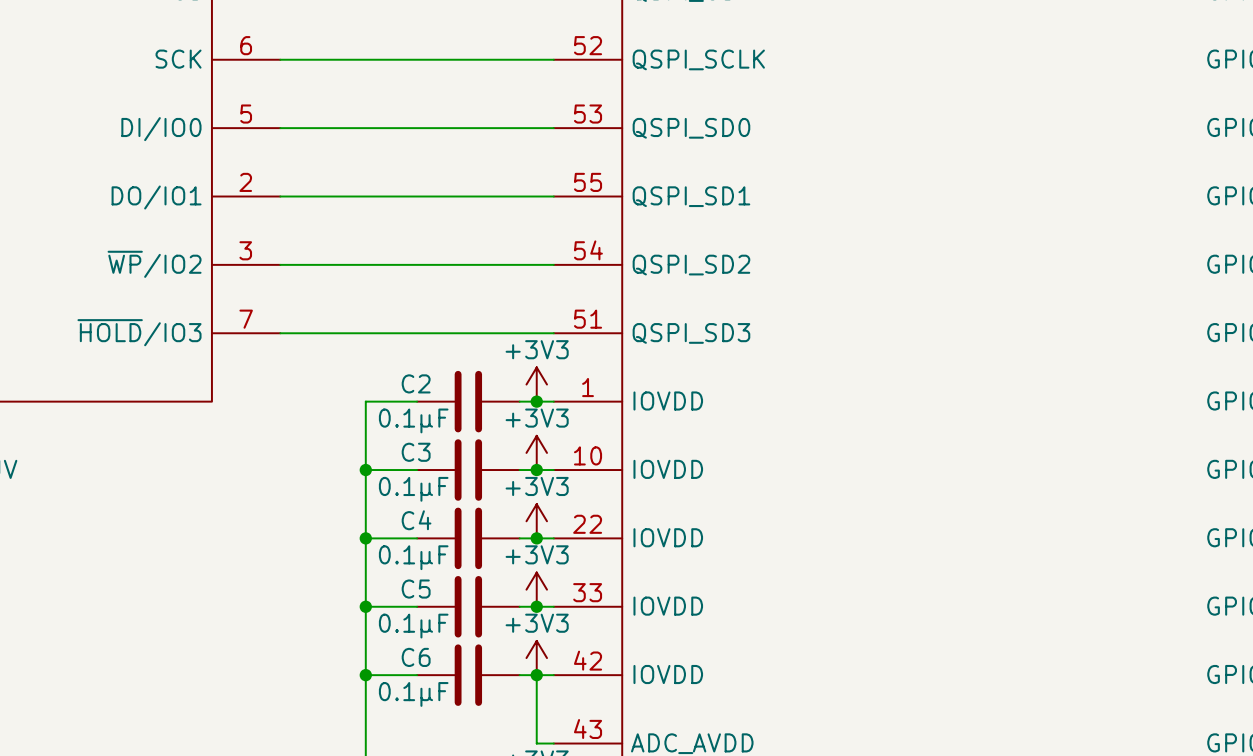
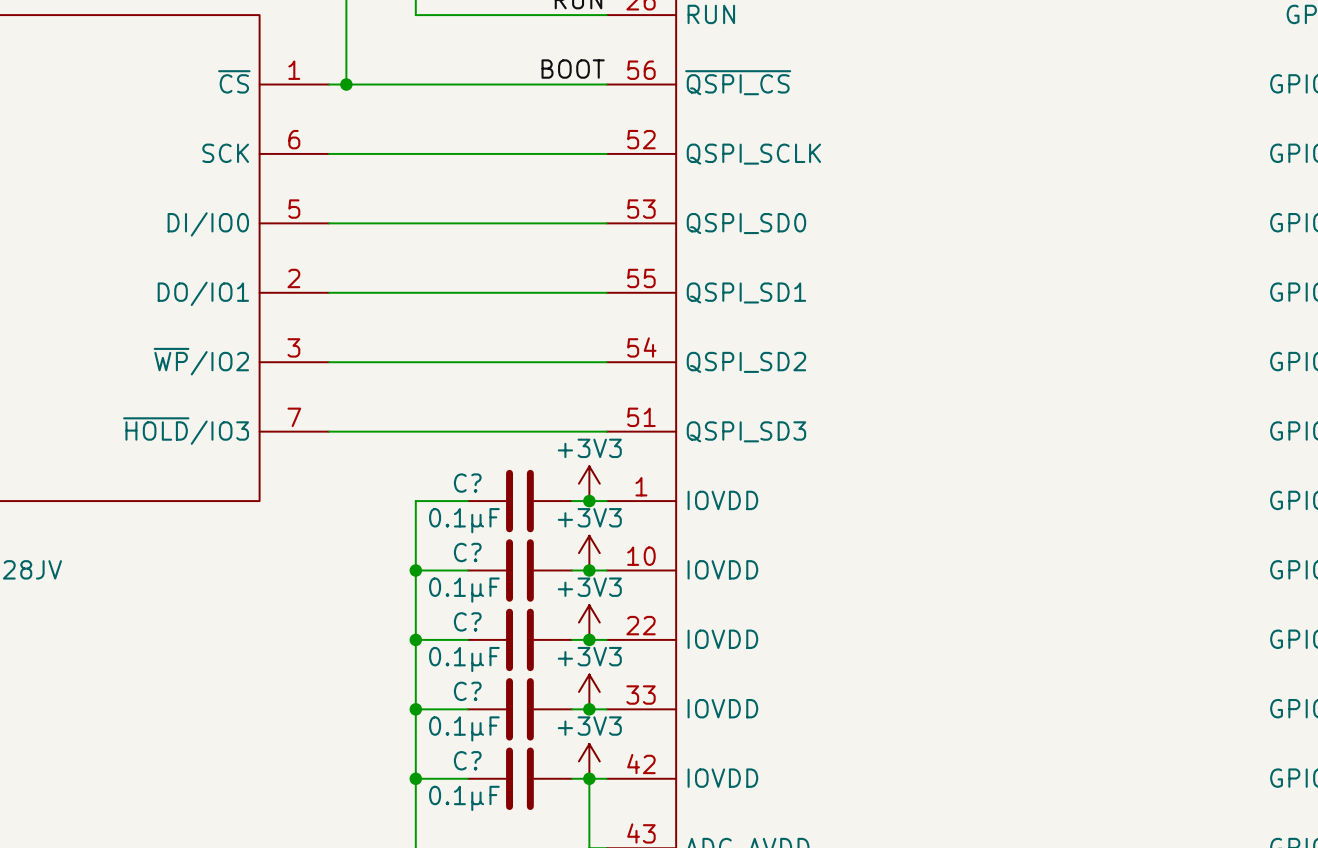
C2 name: C2 (416, 383) -> C? (467, 483)
C3 name: C3 (416, 452) -> C? (467, 552)
C4 name: C4 (416, 520) -> C? (467, 621)
C5 name: C5 (416, 589) -> C? (467, 691)
C6 name: C6 (416, 657) -> C? (467, 760)

